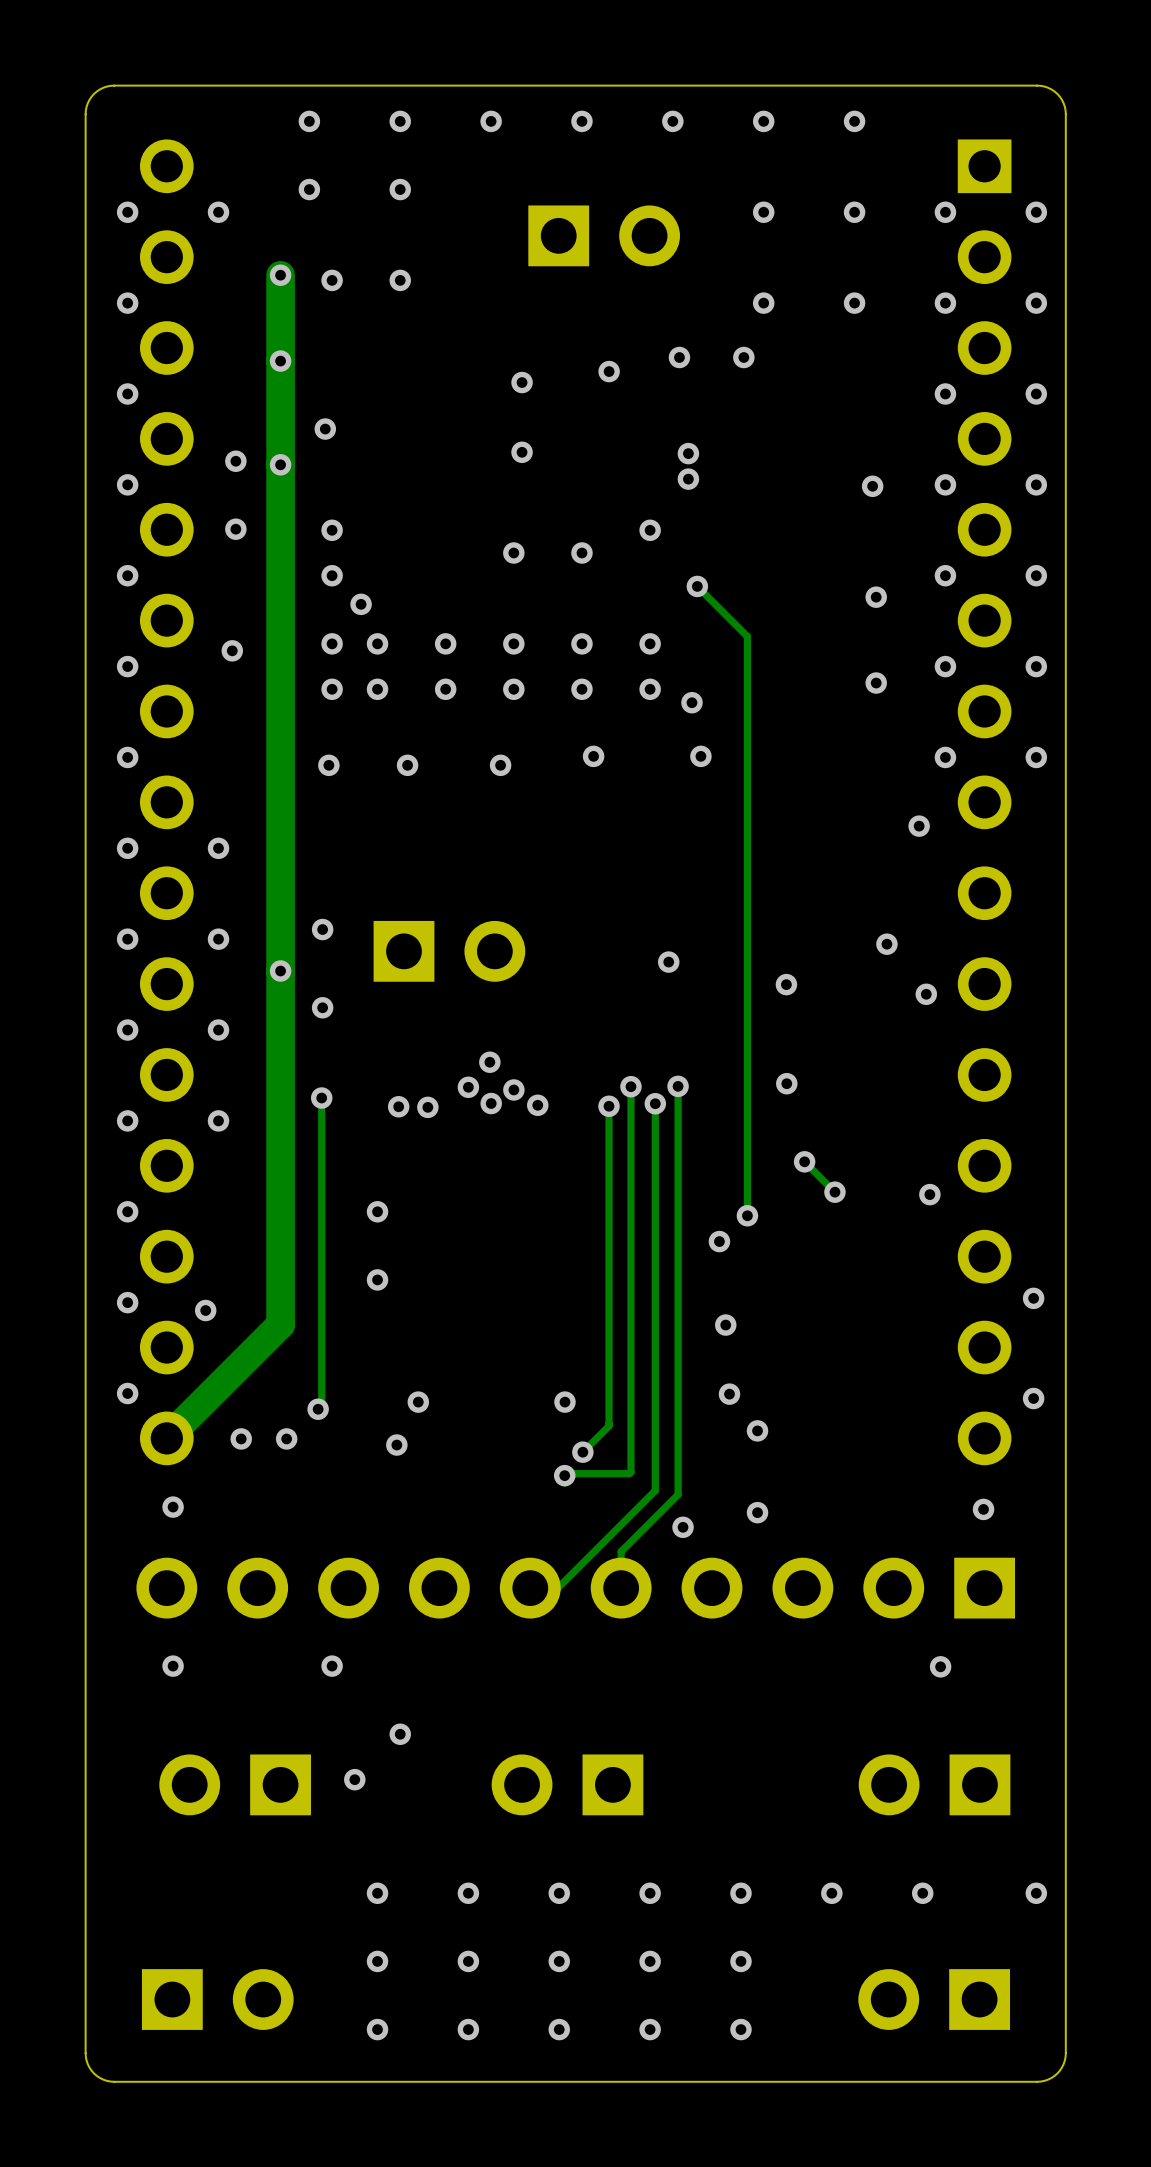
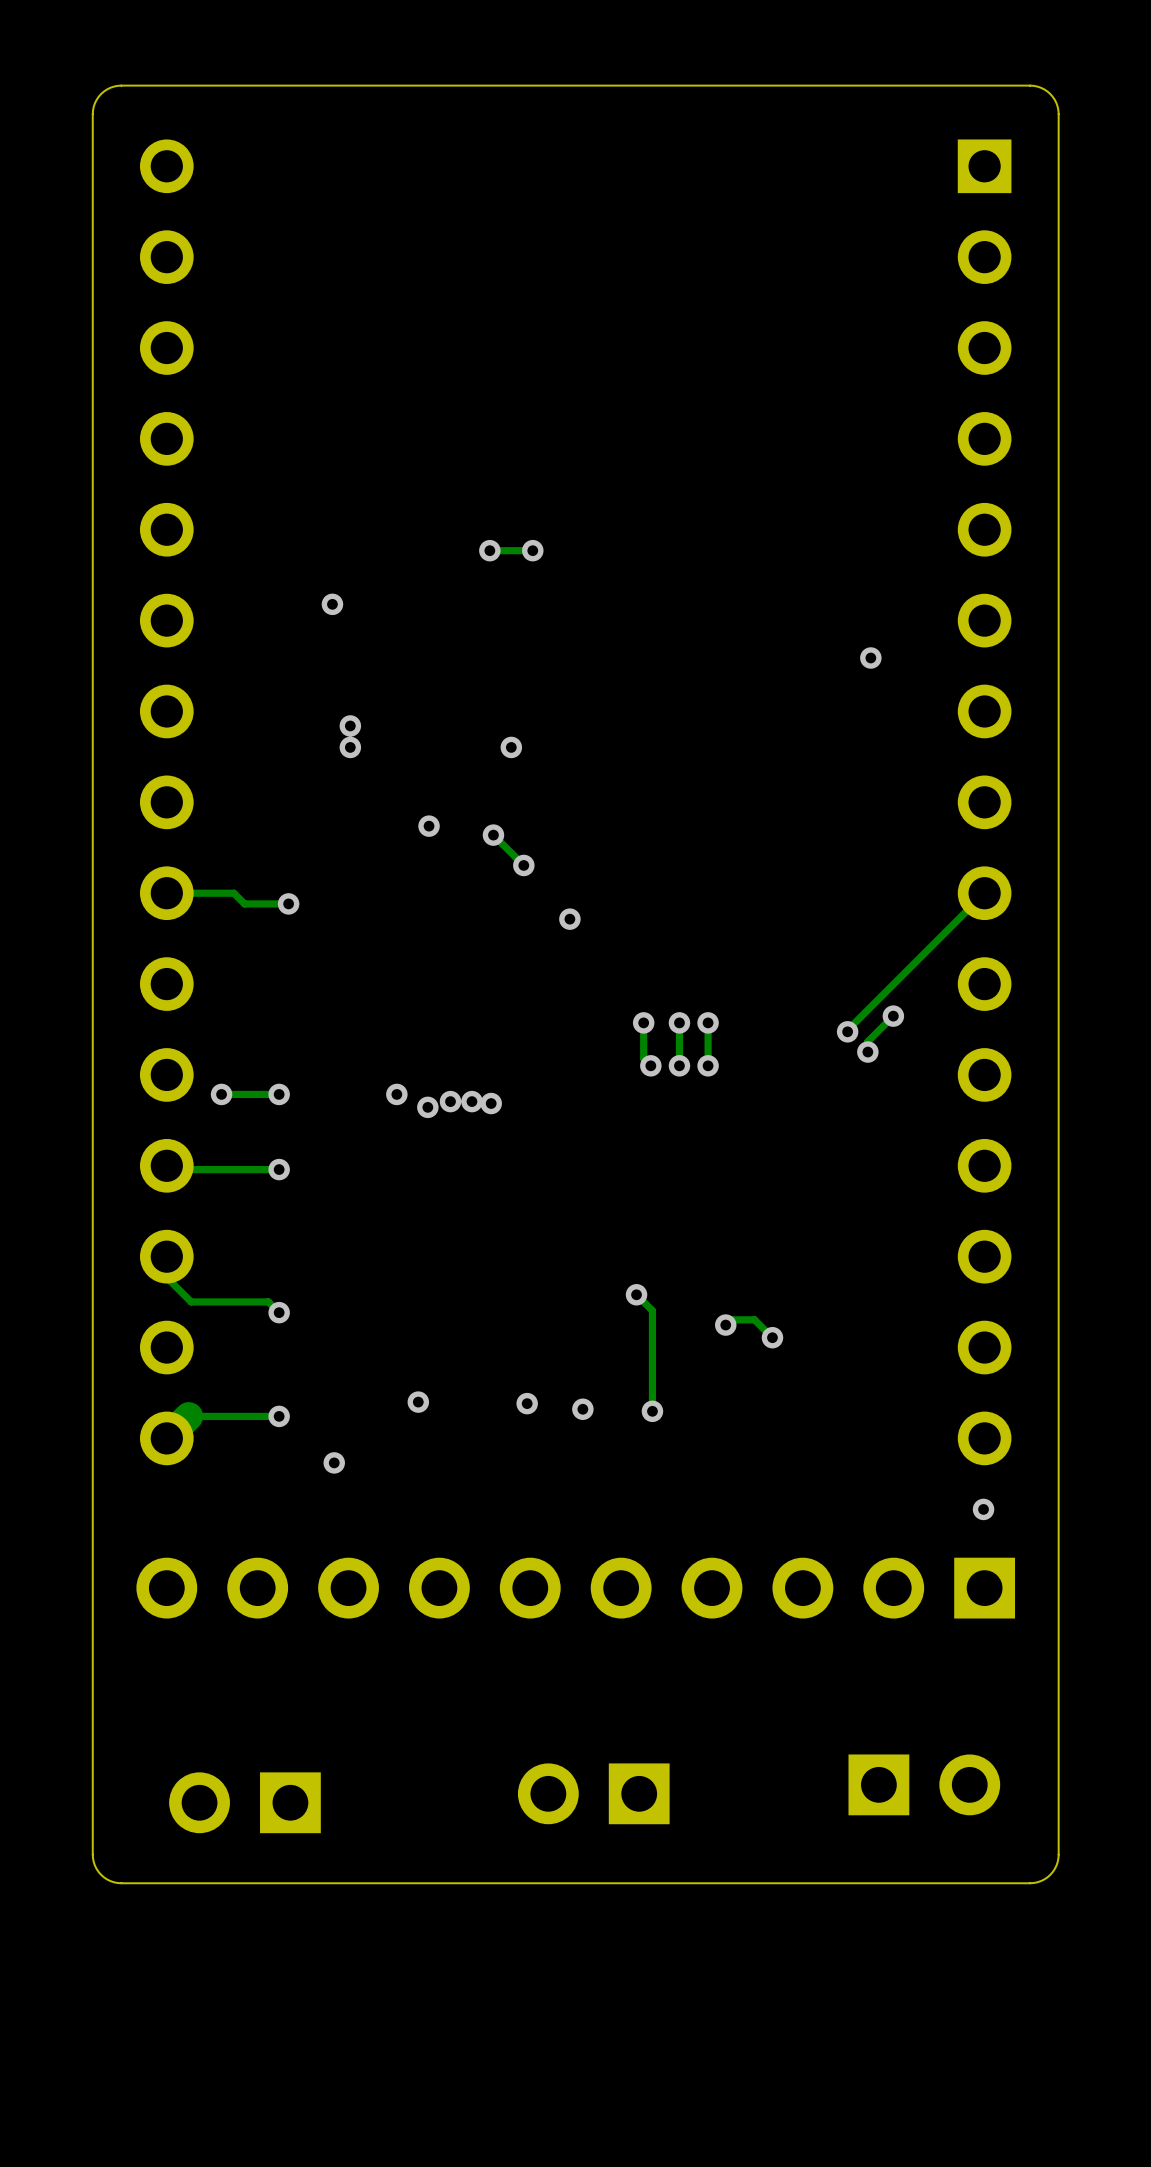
board edge: (1030, 85) (1044, 86) (1054, 91) (1063, 103) (1065, 114) (1065, 2053) (1063, 2064) (1057, 2073) (1048, 2079) (1037, 2081) (114, 2081) (99, 2077) (87, 2064) (85, 2053) (85, 114) (89, 99) (96, 91) (106, 86) (121, 85) -> (1030, 85) (1041, 87) (1050, 93) (1056, 103) (1058, 114) (1058, 1854) (1056, 1865) (1050, 1874) (1041, 1881) (1030, 1883) (121, 1883) (107, 1879) (96, 1868) (92, 1854) (92, 114) (94, 103) (101, 93) (110, 87) (121, 85)
via: (309, 121) -> none
via: (400, 121) -> none
via: (491, 121) -> none
via: (581, 121) -> none
via: (672, 121) -> none
via: (763, 121) -> none
via: (854, 121) -> none
via: (309, 189) -> none
via: (400, 189) -> none
via: (127, 212) -> none
via: (218, 212) -> none
via: (763, 212) -> none
via: (854, 212) -> none
via: (945, 212) -> none
via: (1036, 212) -> none
part: (604, 235) -> none
track: (280, 275) (280, 1324) (188, 1416) -> (279, 1416) (188, 1416)
via: (280, 275) -> none
via: (332, 280) -> none
via: (400, 280) -> none
via: (127, 303) -> none
via: (763, 303) -> none
via: (854, 303) -> none
via: (945, 303) -> none
via: (1036, 303) -> none
via: (679, 357) -> none
via: (743, 357) -> none
via: (280, 361) -> none
via: (609, 371) -> none
via: (522, 382) -> none
via: (127, 393) -> none
via: (945, 393) -> none
via: (1036, 393) -> none
via: (325, 429) -> none
via: (522, 452) -> none
via: (688, 453) -> none
via: (235, 461) -> none
via: (280, 464) -> none
via: (688, 479) -> none
via: (127, 484) -> none
via: (945, 484) -> none
via: (1036, 484) -> none
via: (872, 486) -> none
via: (235, 529) -> none
via: (332, 530) -> none
via: (650, 530) -> none
via: none -> (489, 550)
track: none -> (532, 550) (489, 550)
via position: (513, 553) -> (532, 550)
via: (581, 553) -> none
via: (127, 575) -> none
via: (332, 575) -> none
via: (945, 575) -> none
via: (1036, 575) -> none
track: (697, 586) (747, 636) (747, 1215) -> none
via: (697, 586) -> none
via: (876, 597) -> none
via: none -> (332, 604)
via: (361, 604) -> none
via: (332, 643) -> none
via: (377, 643) -> none
via: (445, 643) -> none
via: (513, 643) -> none
via: (581, 643) -> none
via: (650, 643) -> none
via: (232, 650) -> none
via: (127, 666) -> none
via: (945, 666) -> none
via: (1036, 666) -> none
via position: (876, 683) -> (870, 657)
via: (332, 689) -> none
via: (377, 689) -> none
via: (445, 689) -> none
via: (513, 689) -> none
via: (581, 689) -> none
via: (650, 689) -> none
via: (691, 702) -> none
via: none -> (350, 725)
via: (593, 756) -> none
via: (700, 756) -> none
via: (127, 757) -> none
via: (945, 757) -> none
via: (1036, 757) -> none
via position: (328, 765) -> (350, 747)
via: (407, 765) -> none
via position: (500, 765) -> (511, 747)
via: none -> (429, 826)
via: (919, 826) -> none
via: none -> (493, 835)
via: (127, 848) -> none
via: (218, 848) -> none
via: none -> (523, 865)
track: none -> (166, 893) (233, 893) (244, 903) (288, 903)
track: none -> (984, 893) (847, 1031)
via: none -> (288, 903)
via: none -> (569, 919)
via: (322, 929) -> none
via: (127, 939) -> none
via: (218, 939) -> none
via: (886, 944) -> none
part: (449, 951) -> none
via: (668, 962) -> none
via: (280, 971) -> none
via: (786, 984) -> none
via: (926, 994) -> none
via: (322, 1007) -> none
track: none -> (893, 1016) (867, 1041) (867, 1052)
via: none -> (893, 1016)
track: none -> (643, 1022) (643, 1058) (650, 1065)
via: none -> (643, 1022)
track: none -> (679, 1022) (679, 1065)
via: none -> (679, 1022)
track: none -> (708, 1022) (708, 1065)
via: none -> (708, 1022)
via: (127, 1030) -> none
via: (218, 1030) -> none
via: none -> (847, 1031)
via: none -> (867, 1052)
via: (489, 1062) -> none
via: none -> (708, 1065)
via: (786, 1083) -> none
track: (630, 1086) (630, 1472) (629, 1473) (574, 1473) (564, 1483) -> none
via position: (630, 1086) -> (650, 1065)
track: (678, 1086) (678, 1494) (621, 1551) (621, 1588) -> none
via position: (678, 1086) -> (679, 1065)
via: (468, 1087) -> none
via: (513, 1089) -> none
track: none -> (279, 1094) (221, 1094)
via: none -> (279, 1094)
track: (321, 1098) (321, 1405) (318, 1409) -> none
via: (321, 1098) -> none
via: none -> (450, 1101)
via: none -> (471, 1101)
track: (655, 1103) (655, 1490) (557, 1588) (530, 1588) -> none
via: (655, 1103) -> none
via: (537, 1105) -> none
via position: (398, 1106) -> (396, 1094)
track: (609, 1106) (609, 1426) (582, 1452) -> none
via: (609, 1106) -> none
via: (127, 1120) -> none
via position: (218, 1120) -> (221, 1094)
track: (804, 1161) (834, 1192) -> (493, 835) (523, 865)
via: (804, 1161) -> none
track: none -> (166, 1165) (170, 1169) (279, 1169)
via: none -> (279, 1169)
via: (834, 1192) -> none
via: (929, 1194) -> none
via: (127, 1211) -> none
via: (377, 1211) -> none
via: (747, 1215) -> none
via: (719, 1241) -> none
track: none -> (166, 1256) (166, 1277) (191, 1301) (268, 1301) (279, 1312)
via: (377, 1279) -> none
track: none -> (636, 1294) (652, 1310) (652, 1411)
via: none -> (636, 1294)
via: (1033, 1298) -> none
via: (127, 1302) -> none
via: (205, 1310) -> none
via: none -> (279, 1312)
track: none -> (726, 1319) (754, 1319) (772, 1337)
via: none -> (772, 1337)
via: (127, 1393) -> none
via: (729, 1394) -> none
via: (1033, 1398) -> none
via position: (564, 1402) -> (582, 1409)
via: none -> (527, 1403)
via: (318, 1409) -> none
via: none -> (652, 1411)
via: none -> (279, 1416)
via: (757, 1430) -> none
via: (241, 1438) -> none
via: (286, 1438) -> none
via: (396, 1445) -> none
via: (582, 1452) -> none
via: none -> (334, 1462)
via: (564, 1475) -> none
via: (173, 1507) -> none
via: (757, 1512) -> none
via: (683, 1527) -> none
via: (173, 1666) -> none
via: (332, 1666) -> none
via: (940, 1666) -> none
via: (400, 1734) -> none
via: (354, 1779) -> none
part position: (235, 1784) -> (244, 1802)
part position: (567, 1784) -> (593, 1793)
part rotation: 0° (934, 1784) -> 180° (924, 1784)
via: (377, 1893) -> none
via: (468, 1893) -> none
via: (559, 1893) -> none
via: (650, 1893) -> none
via: (740, 1893) -> none
via: (831, 1893) -> none
via: (922, 1893) -> none
via: (1036, 1893) -> none
via: (377, 1961) -> none
via: (468, 1961) -> none
via: (559, 1961) -> none
via: (650, 1961) -> none
via: (740, 1961) -> none
part: (217, 1999) -> none
part: (934, 1999) -> none
via: (377, 2029) -> none
via: (468, 2029) -> none
via: (559, 2029) -> none
via: (650, 2029) -> none
via: (740, 2029) -> none

